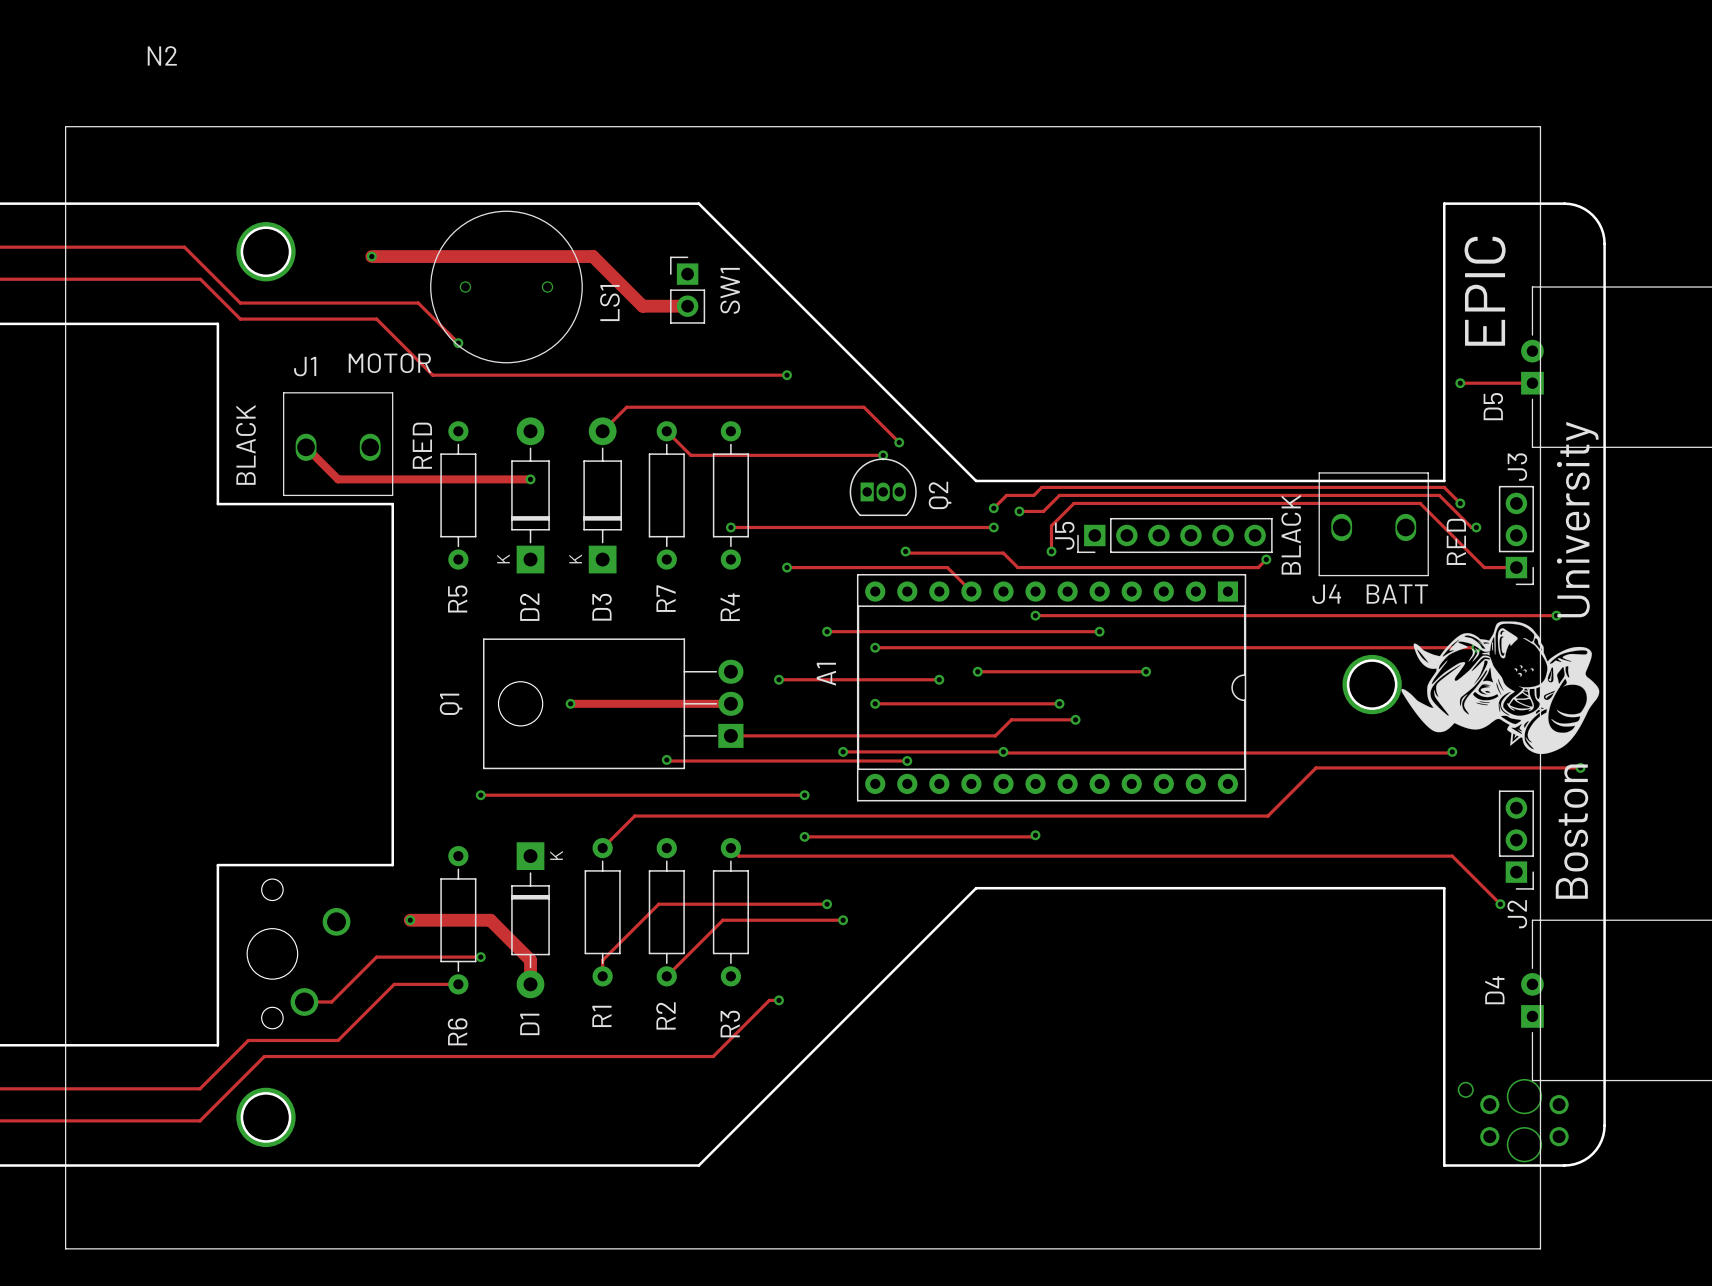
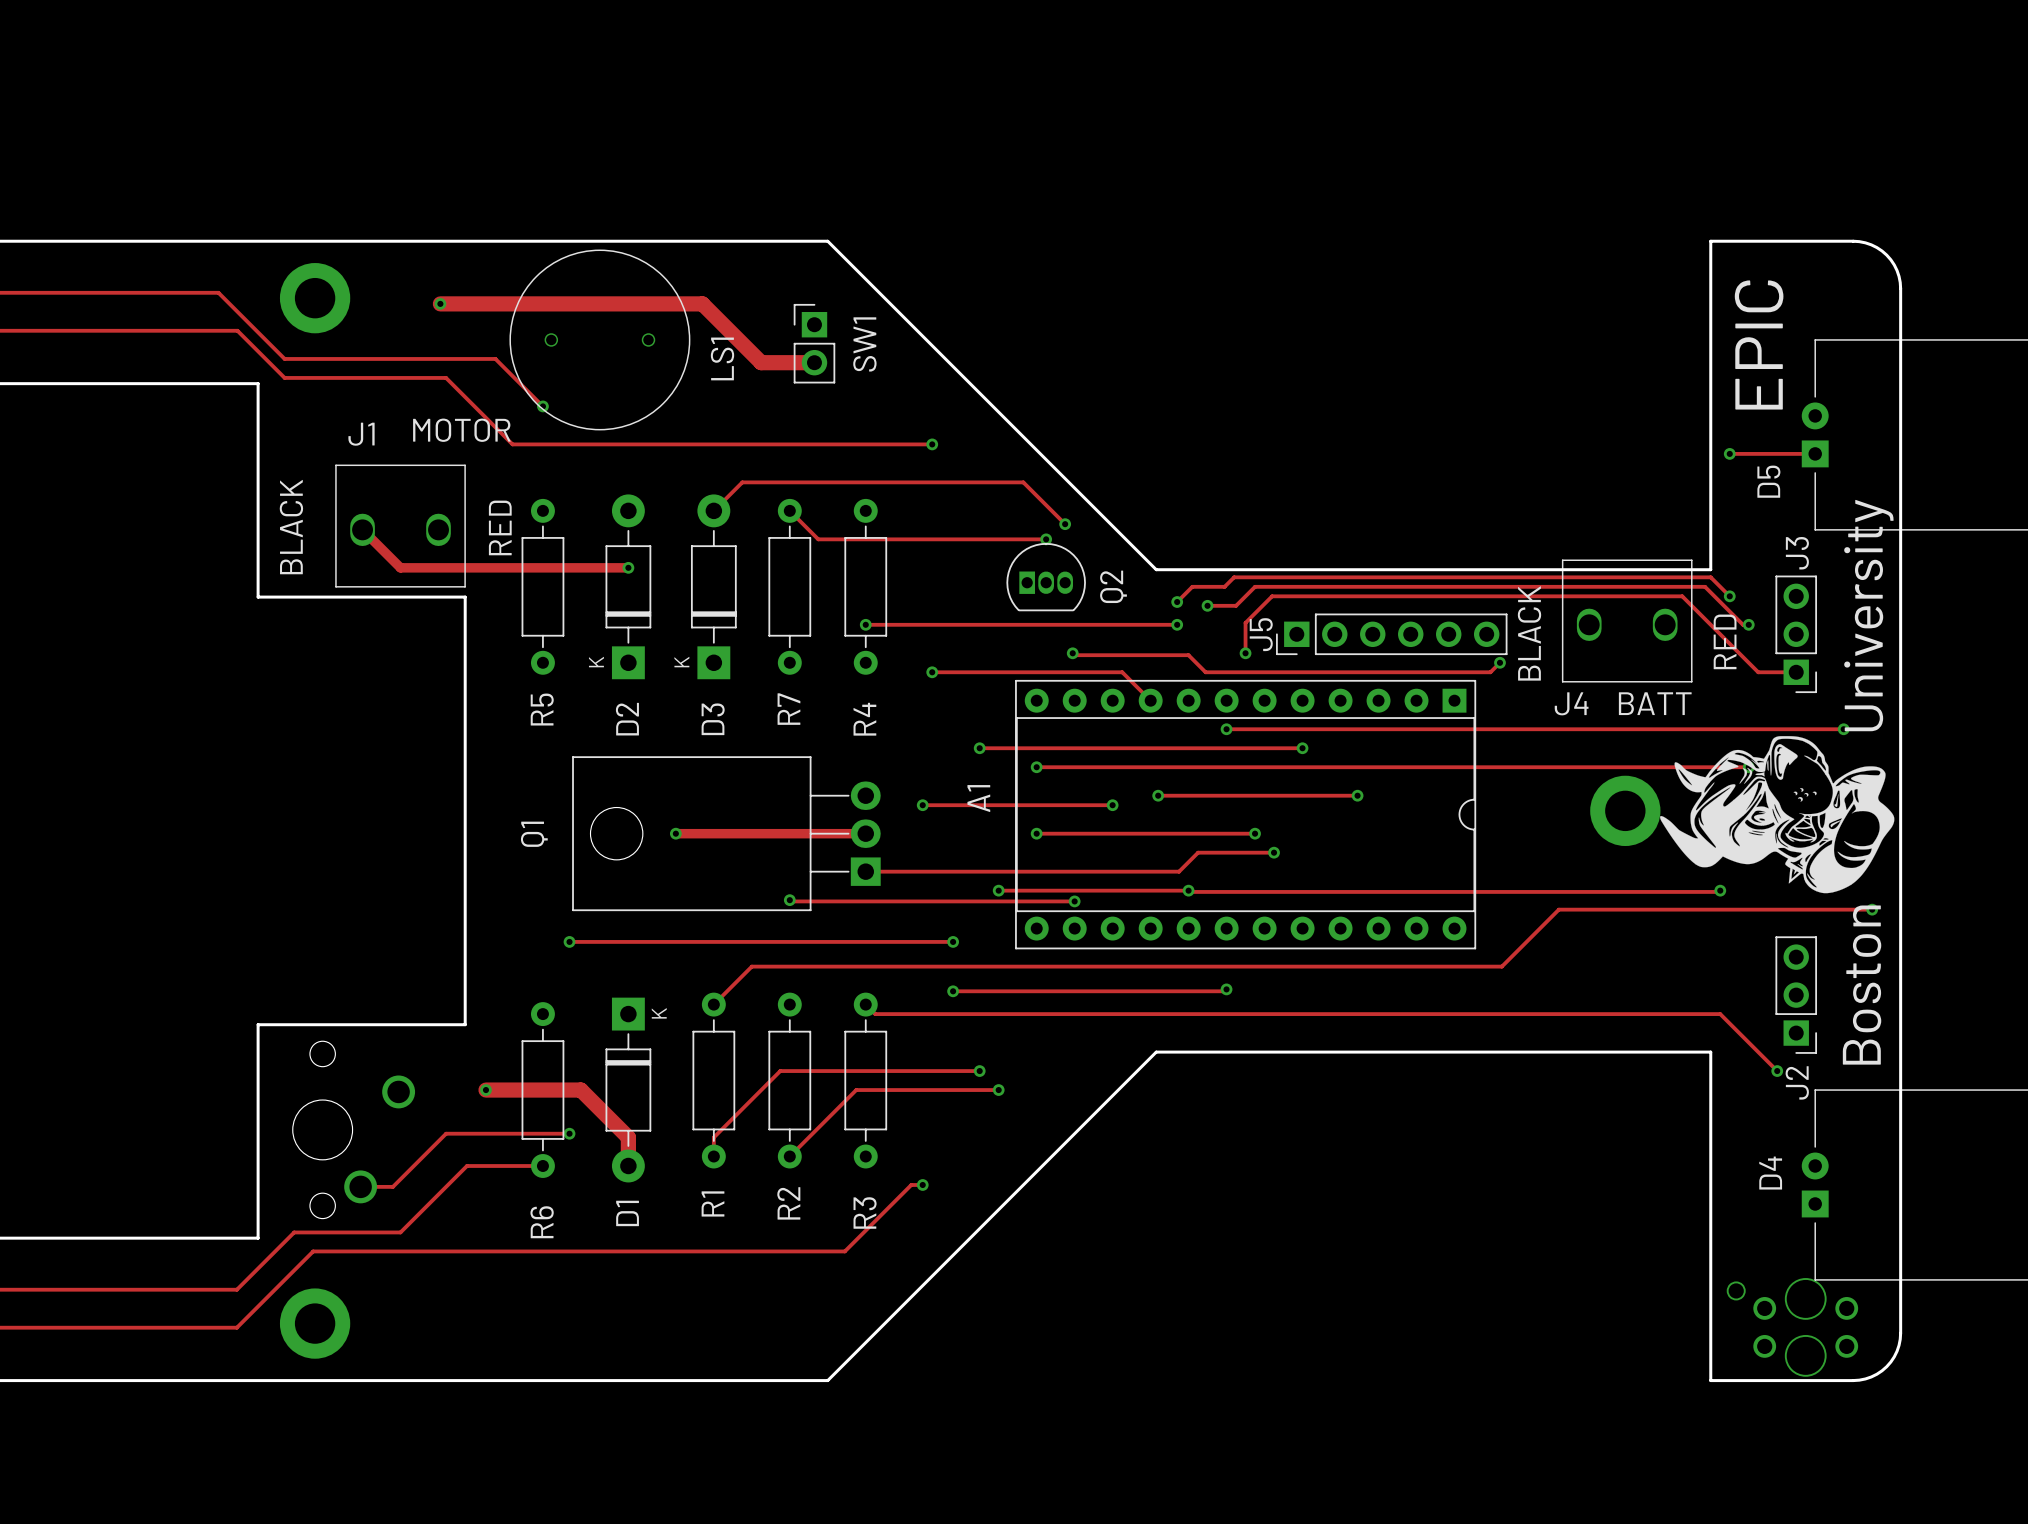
round board edge: [240, 226, 292, 278] -> none
round board edge: [1346, 659, 1398, 710] -> none
N2: (803, 687) -> none
round board edge: [240, 1092, 292, 1143] -> none

